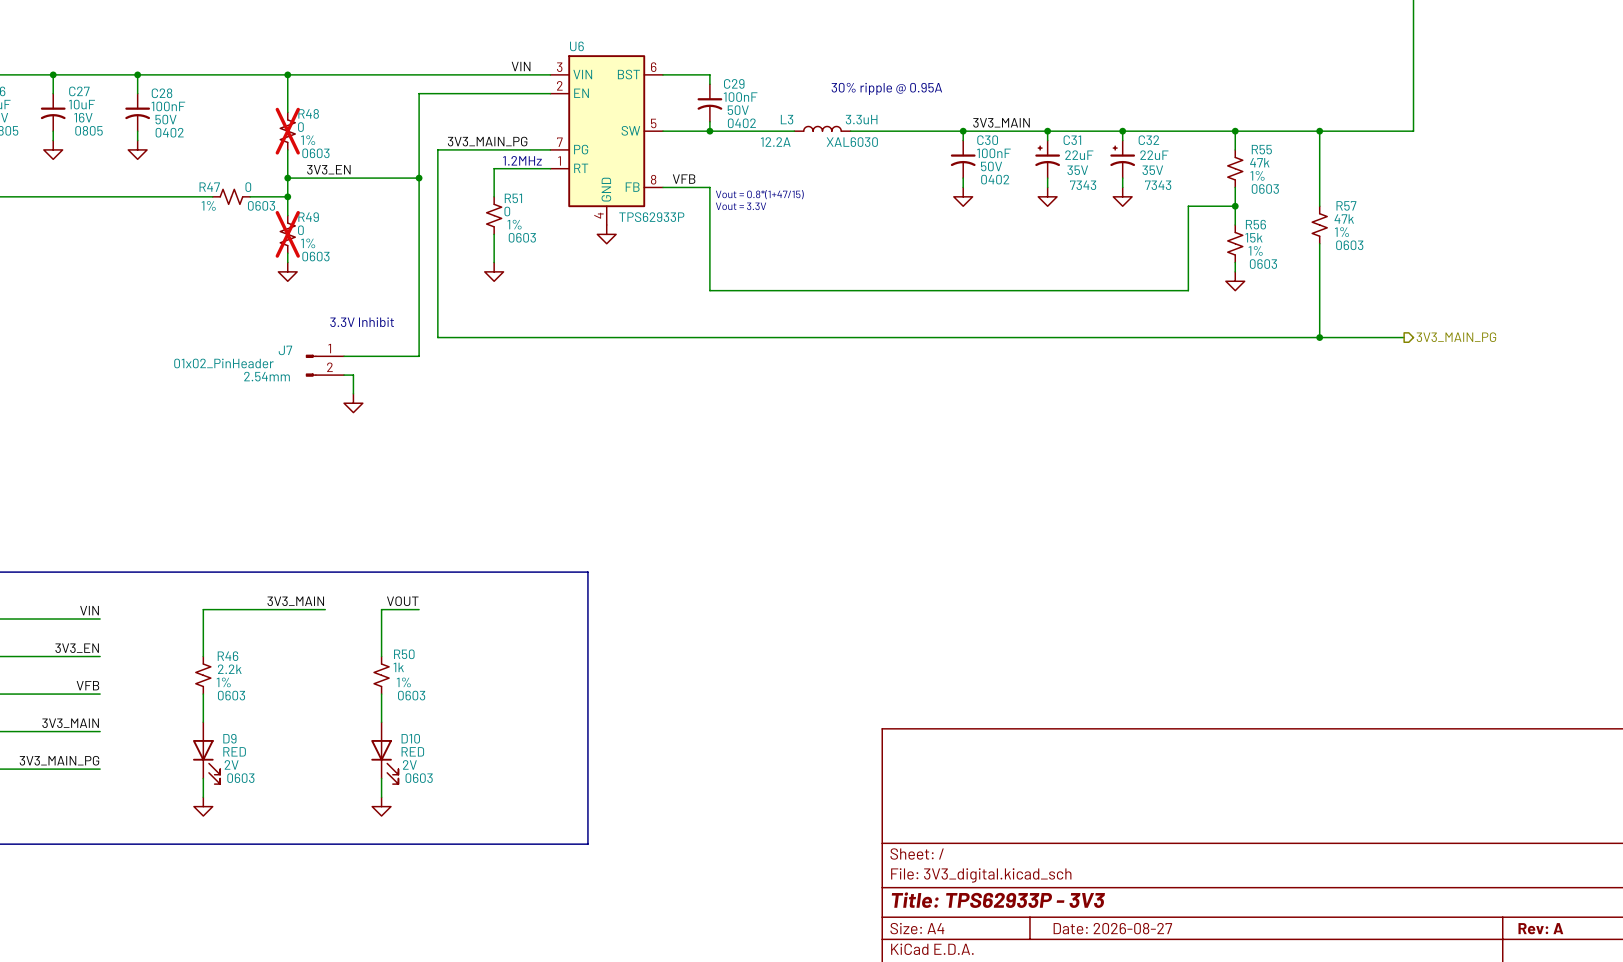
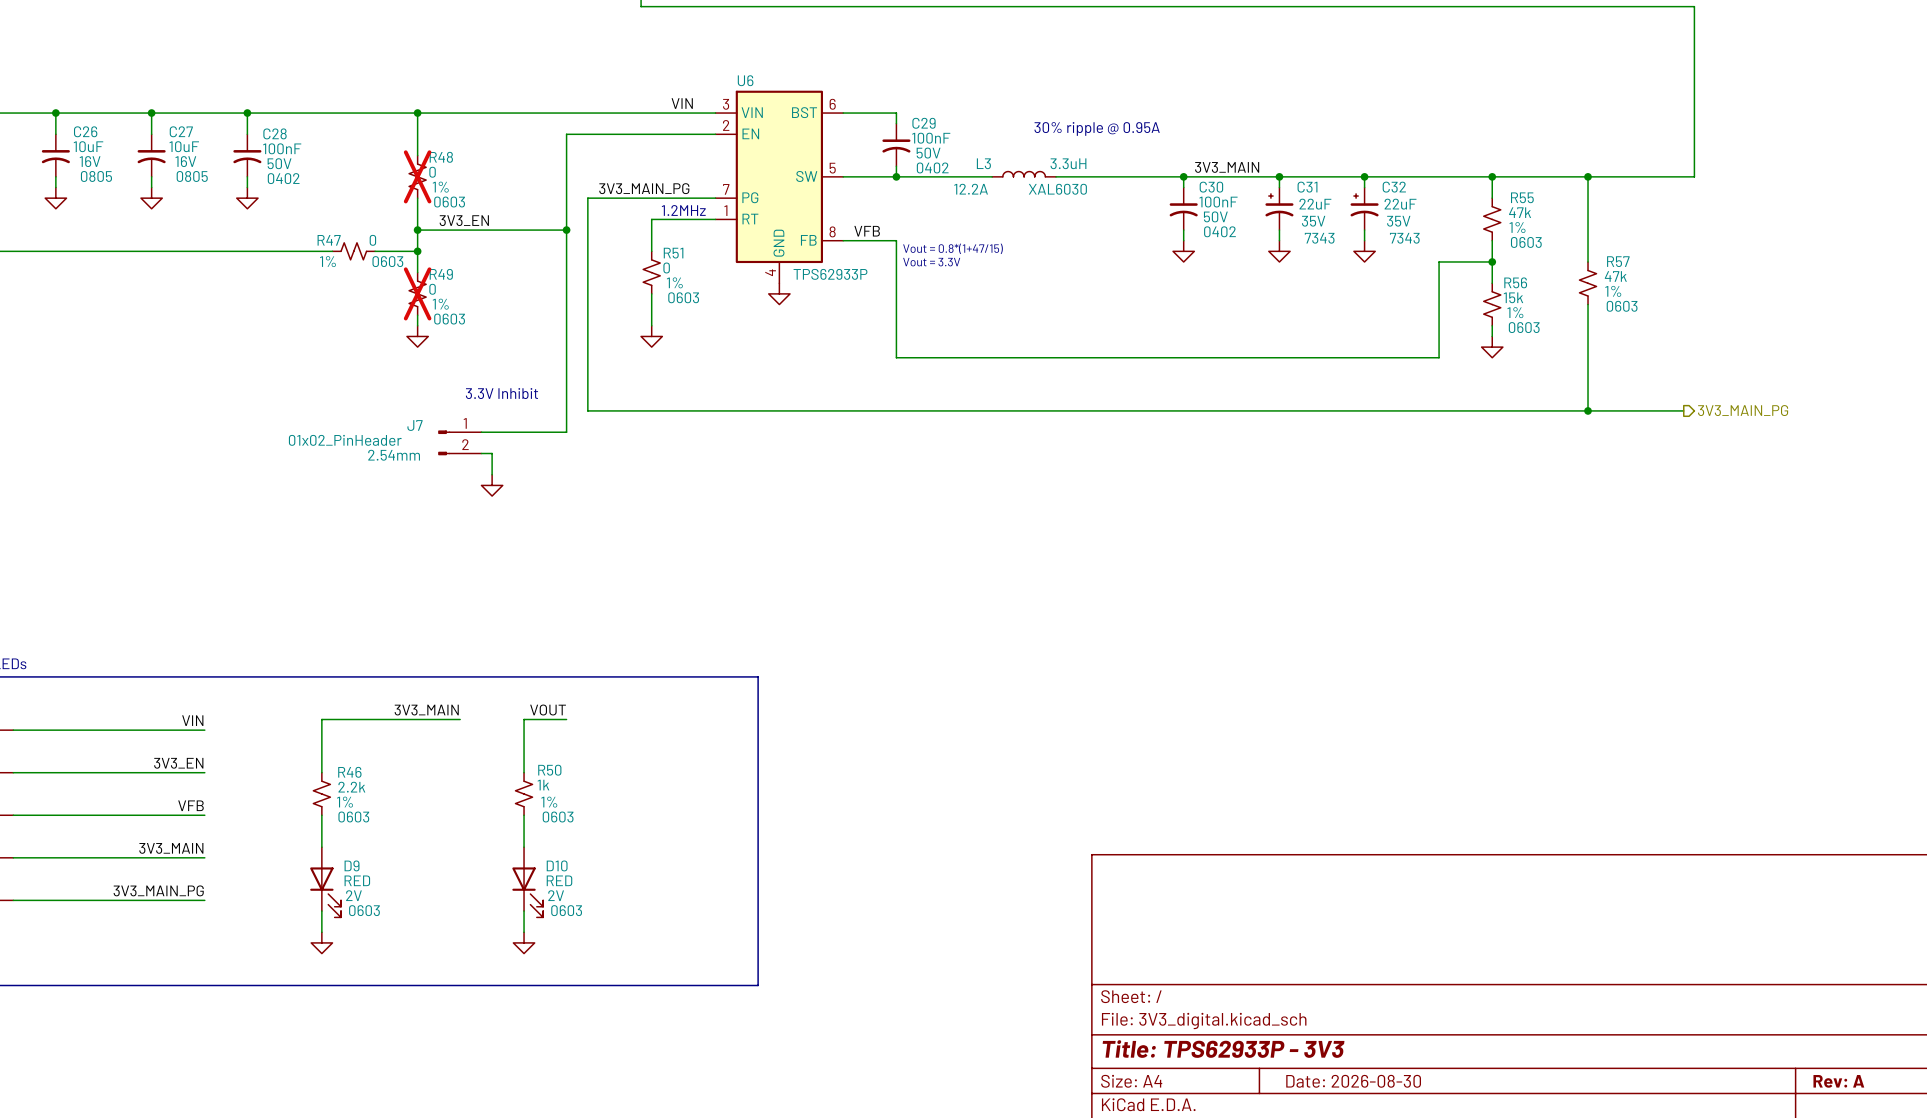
title block: Date: 2026-08-27 (1112, 928) -> Date: 2026-08-30 (1353, 1081)

